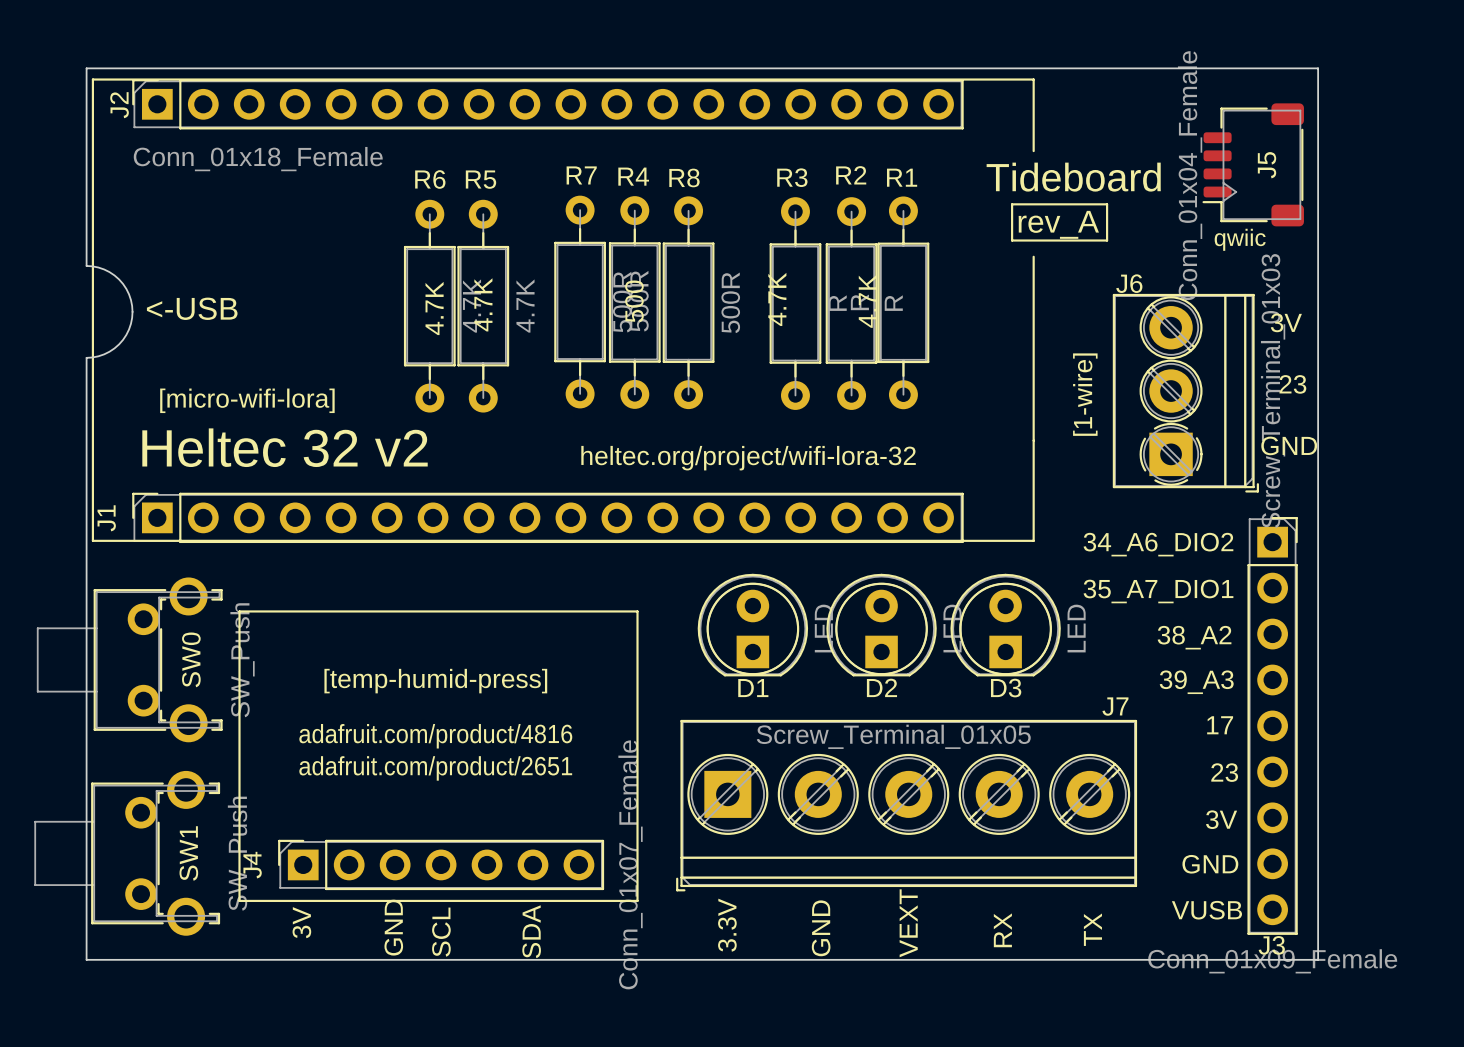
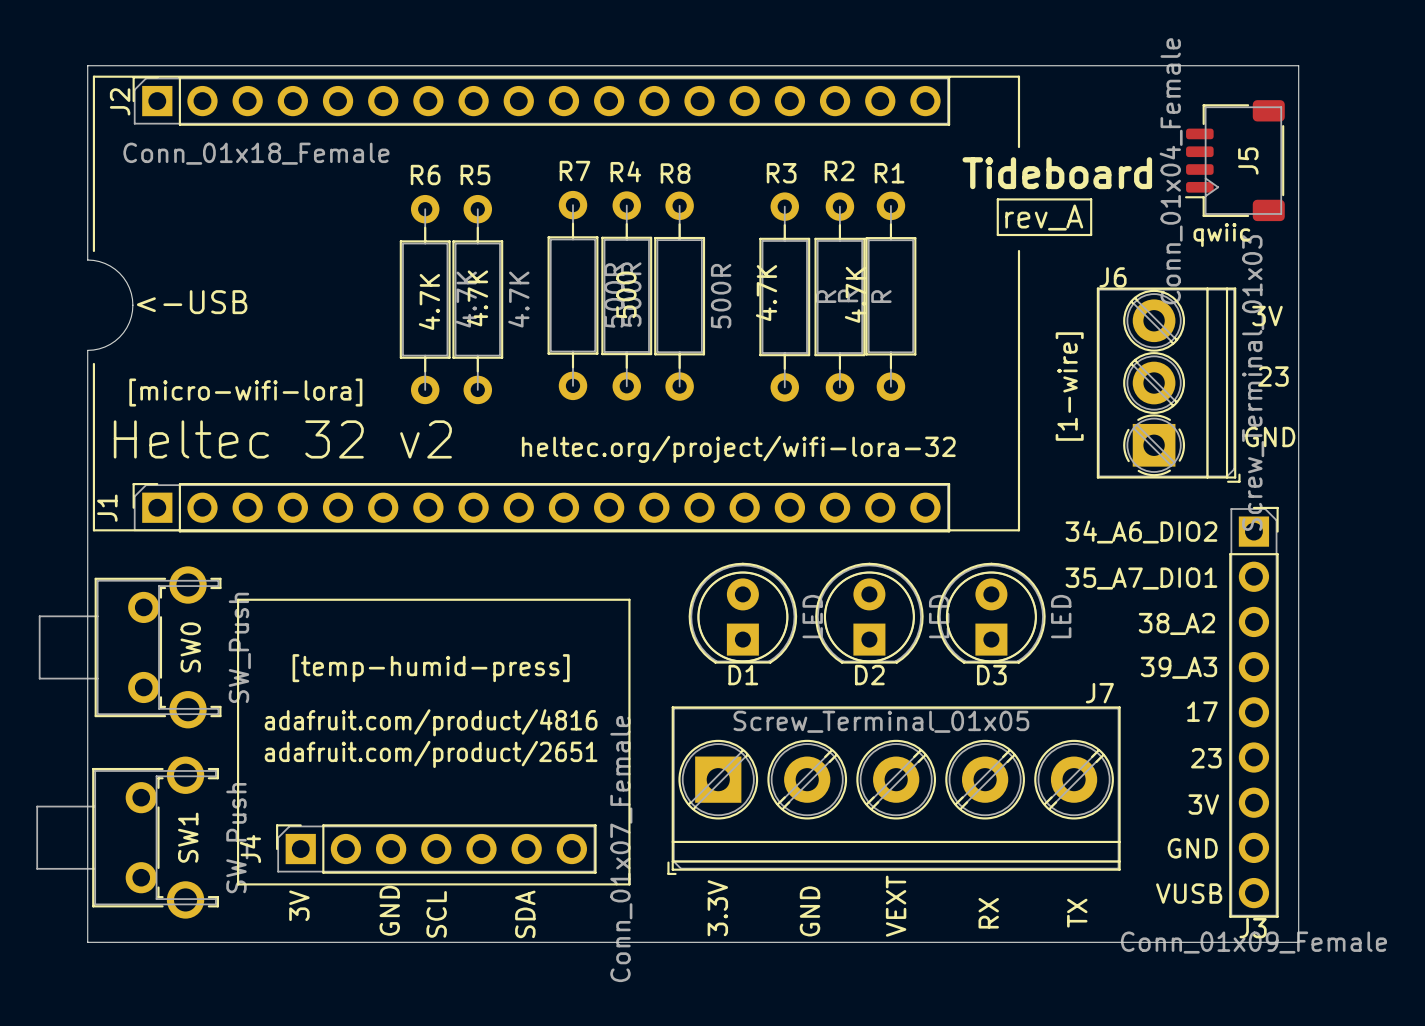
line: (92, 256) (92, 371) -> none

